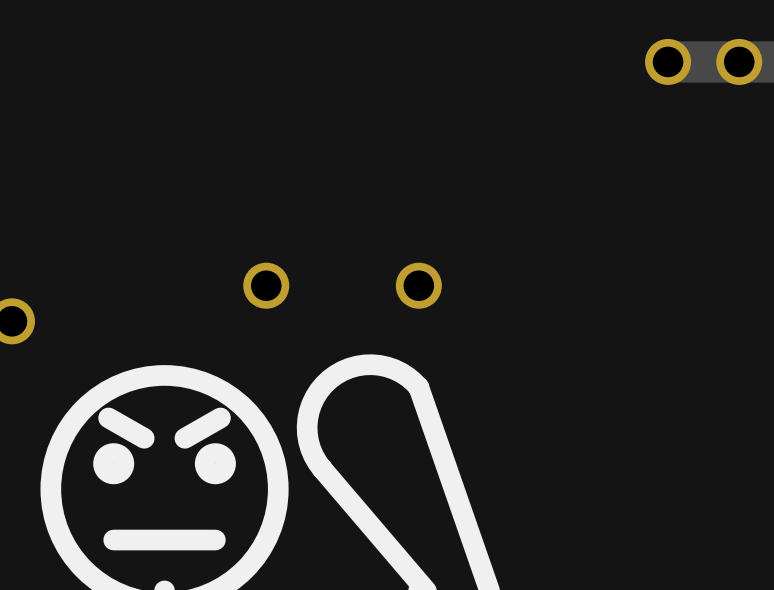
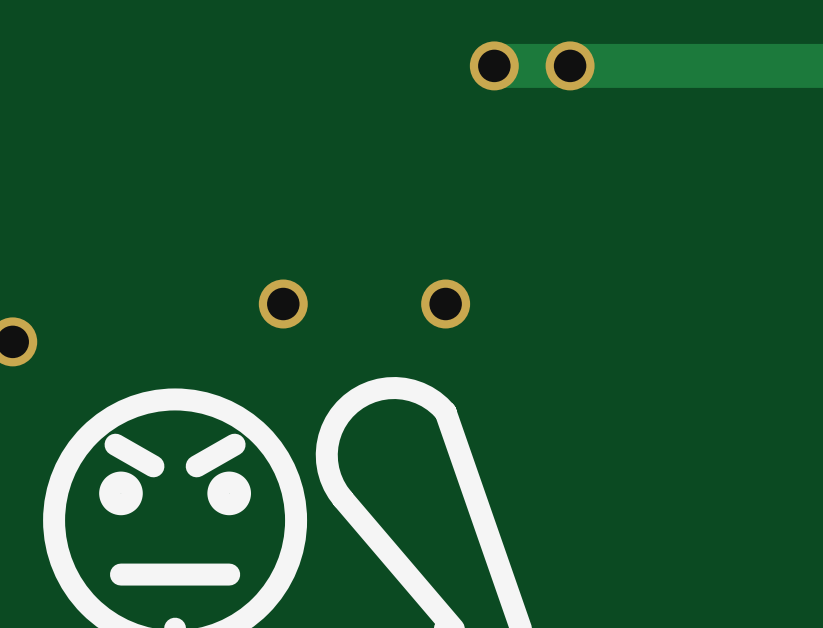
track: none -> (494, 65) (710, 65)
via: none -> (494, 65)
via: none -> (570, 65)
via: (668, 61) -> none
via: (739, 61) -> none

